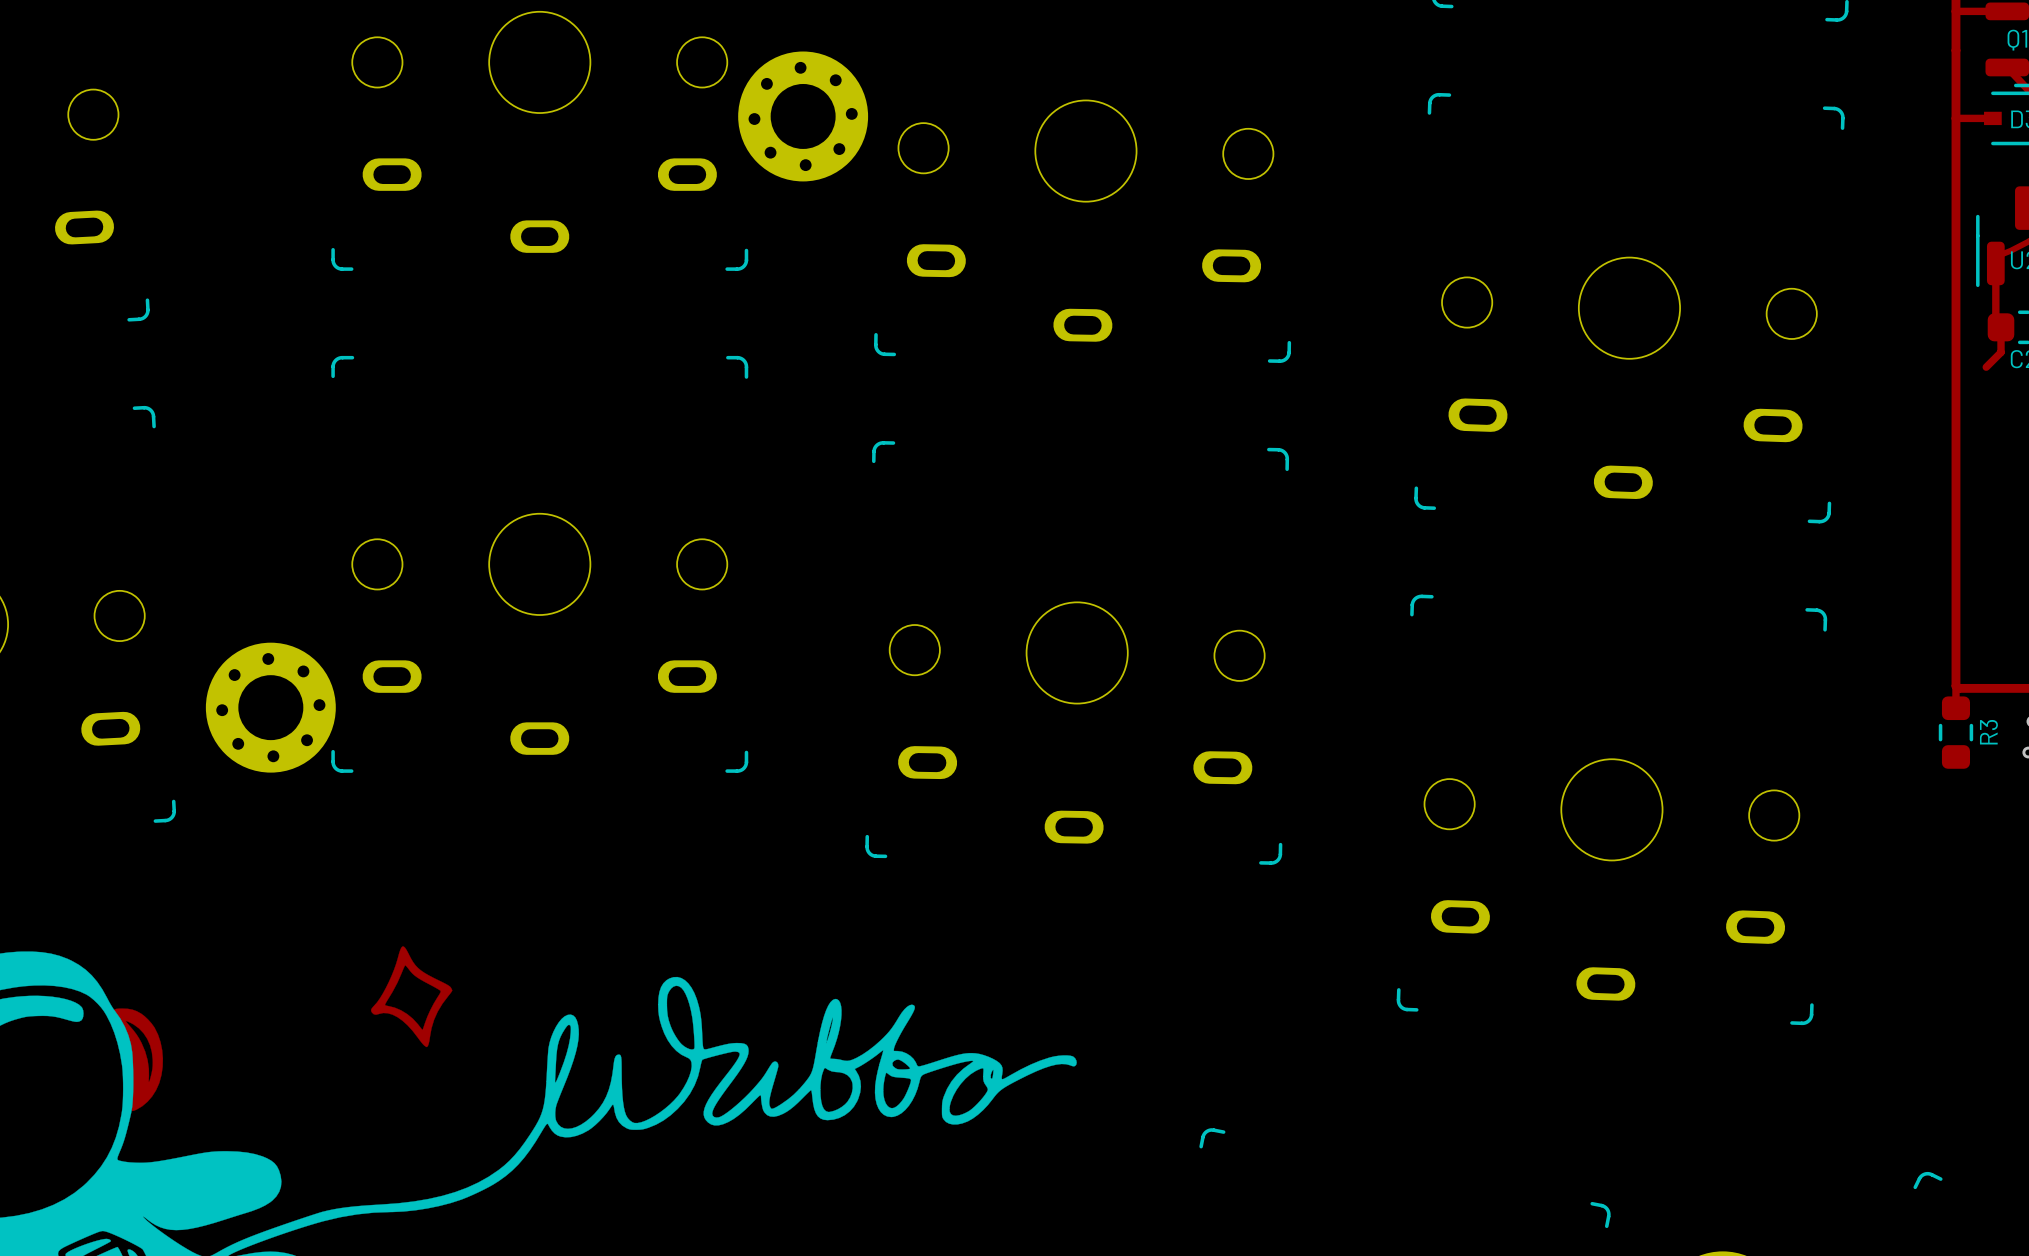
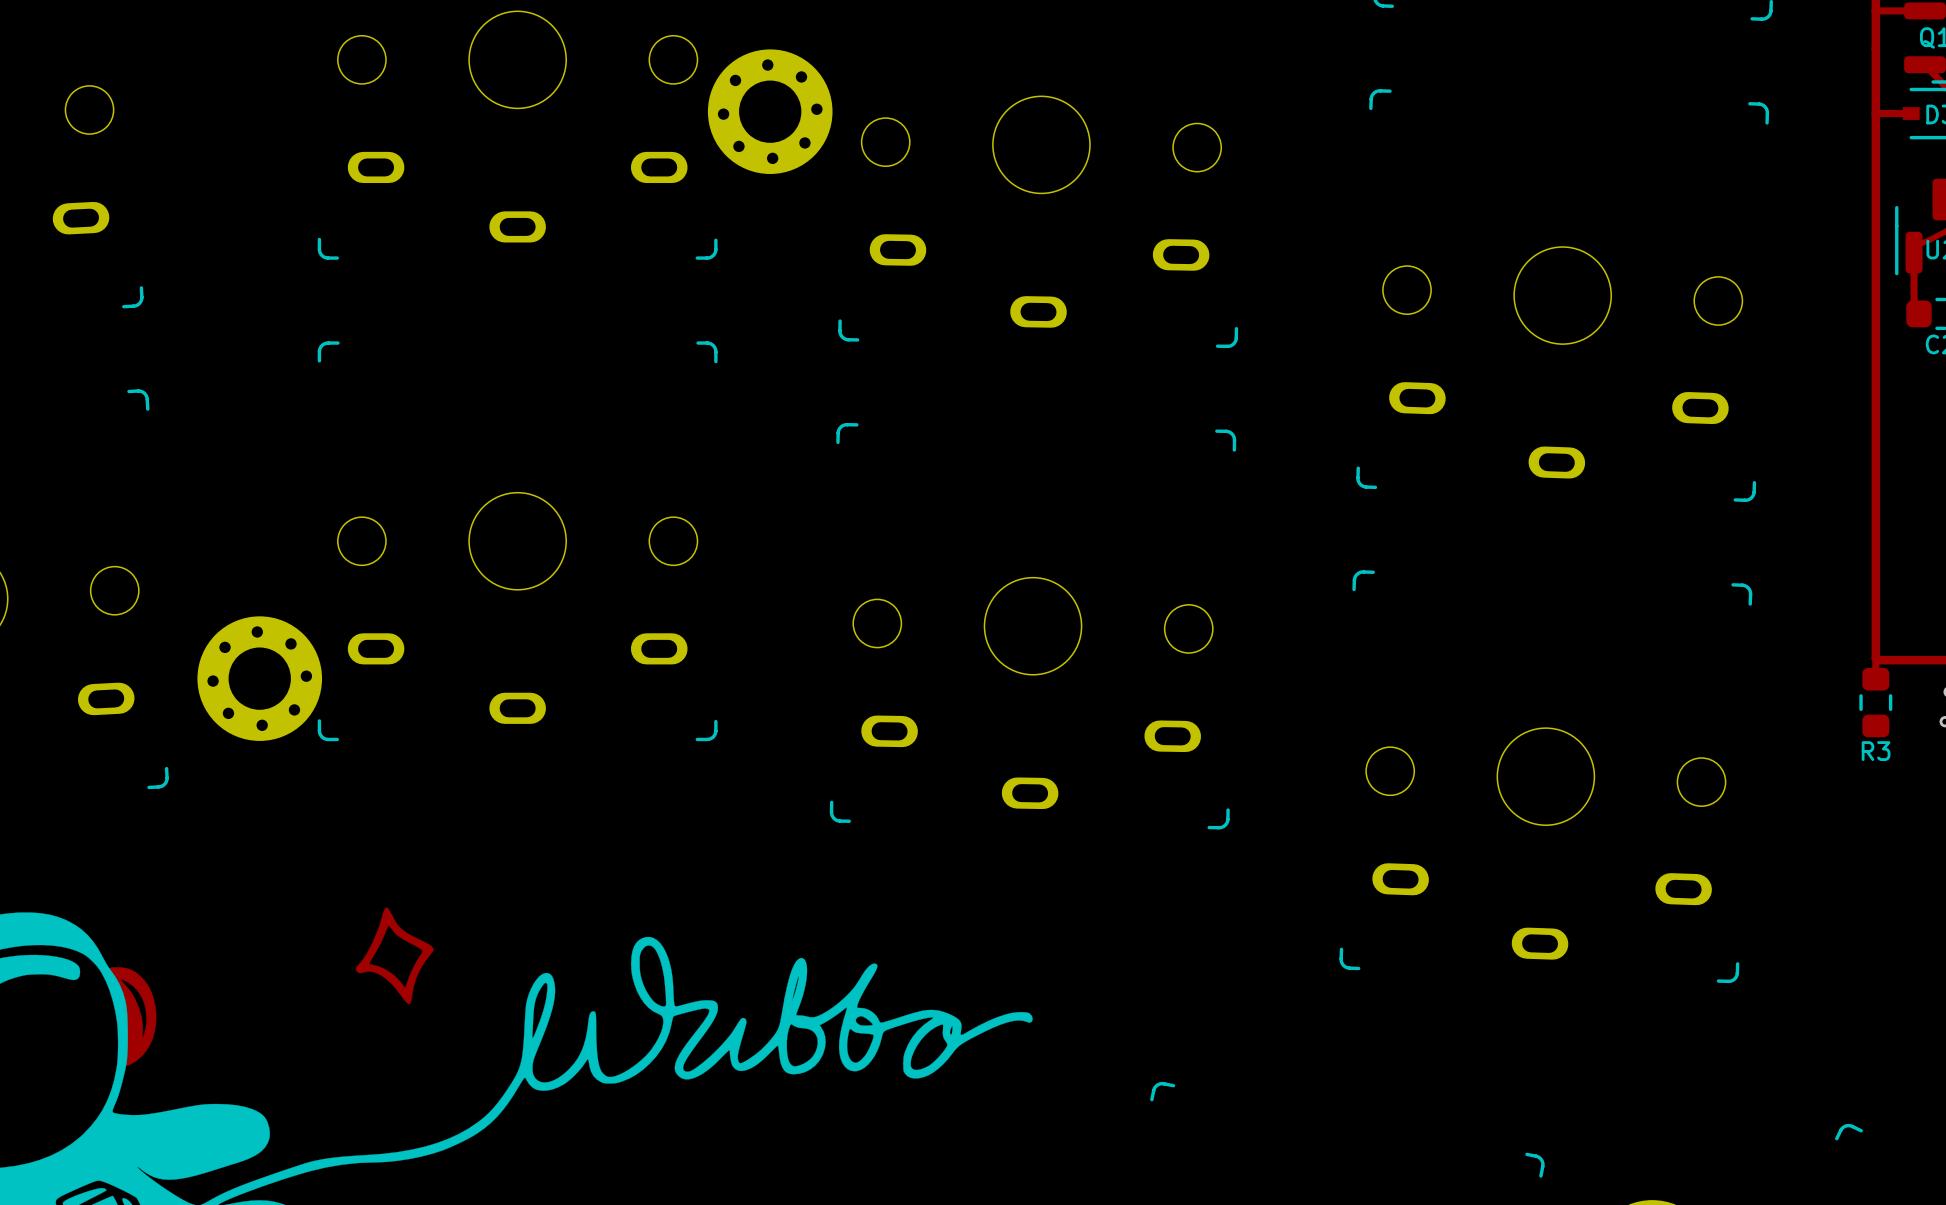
track: (2001, 327) (2001, 352) (1986, 367) -> none
R3 name rotation: 0° (1988, 732) -> 90° clockwise (1876, 751)
R3 name position: R3 (1988, 732) -> R3 (1876, 751)

